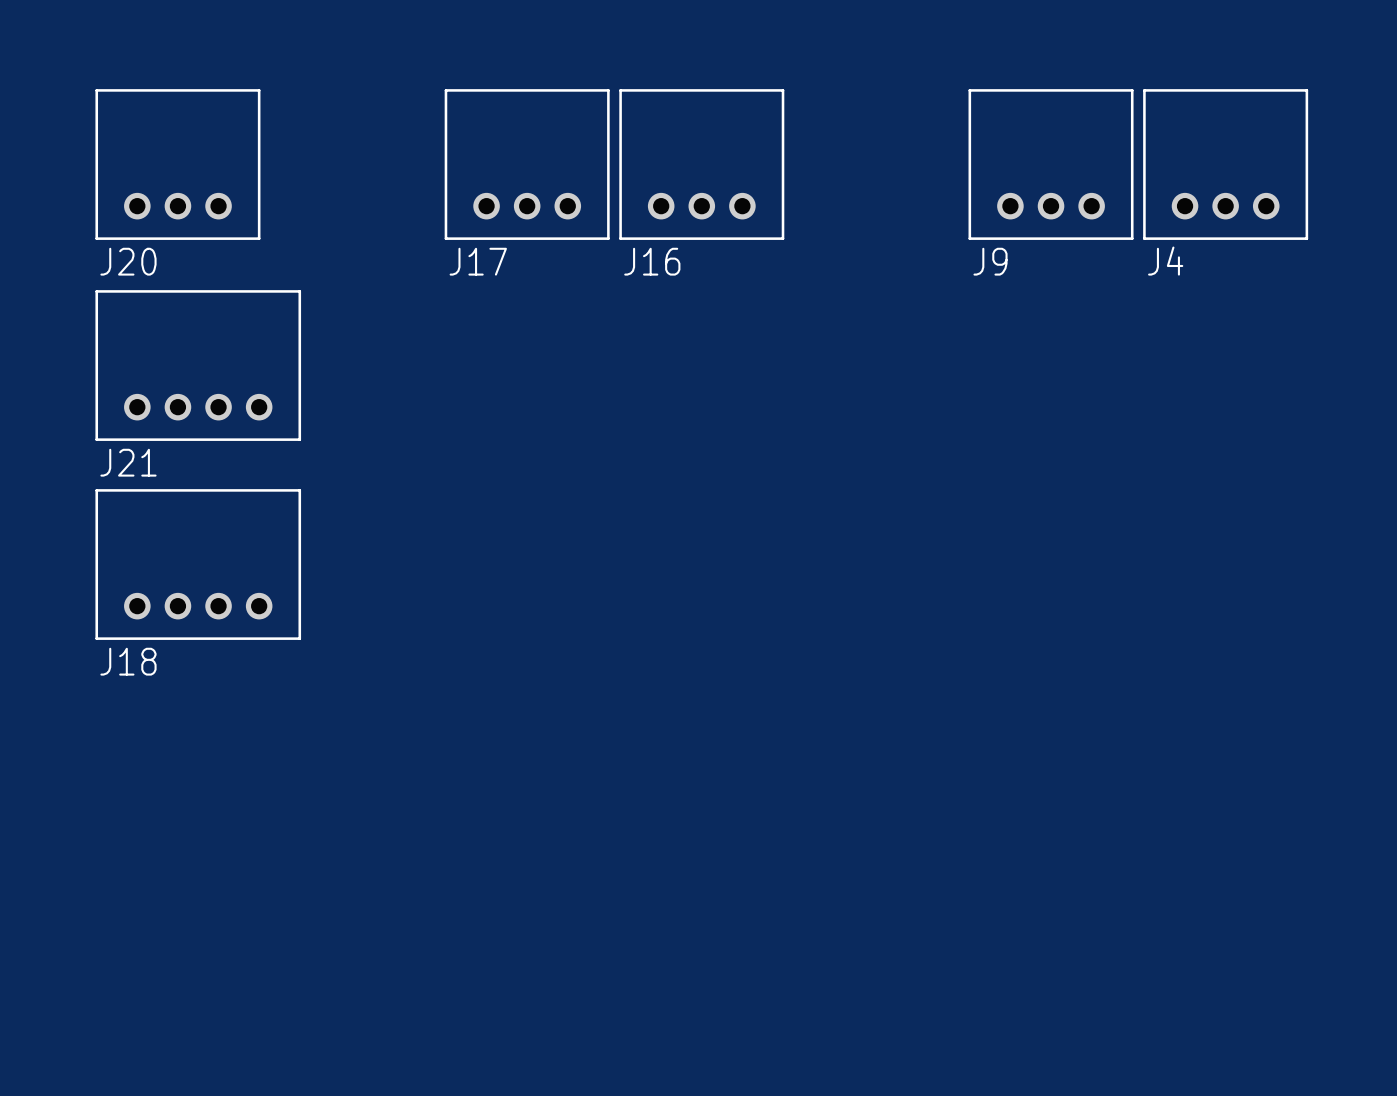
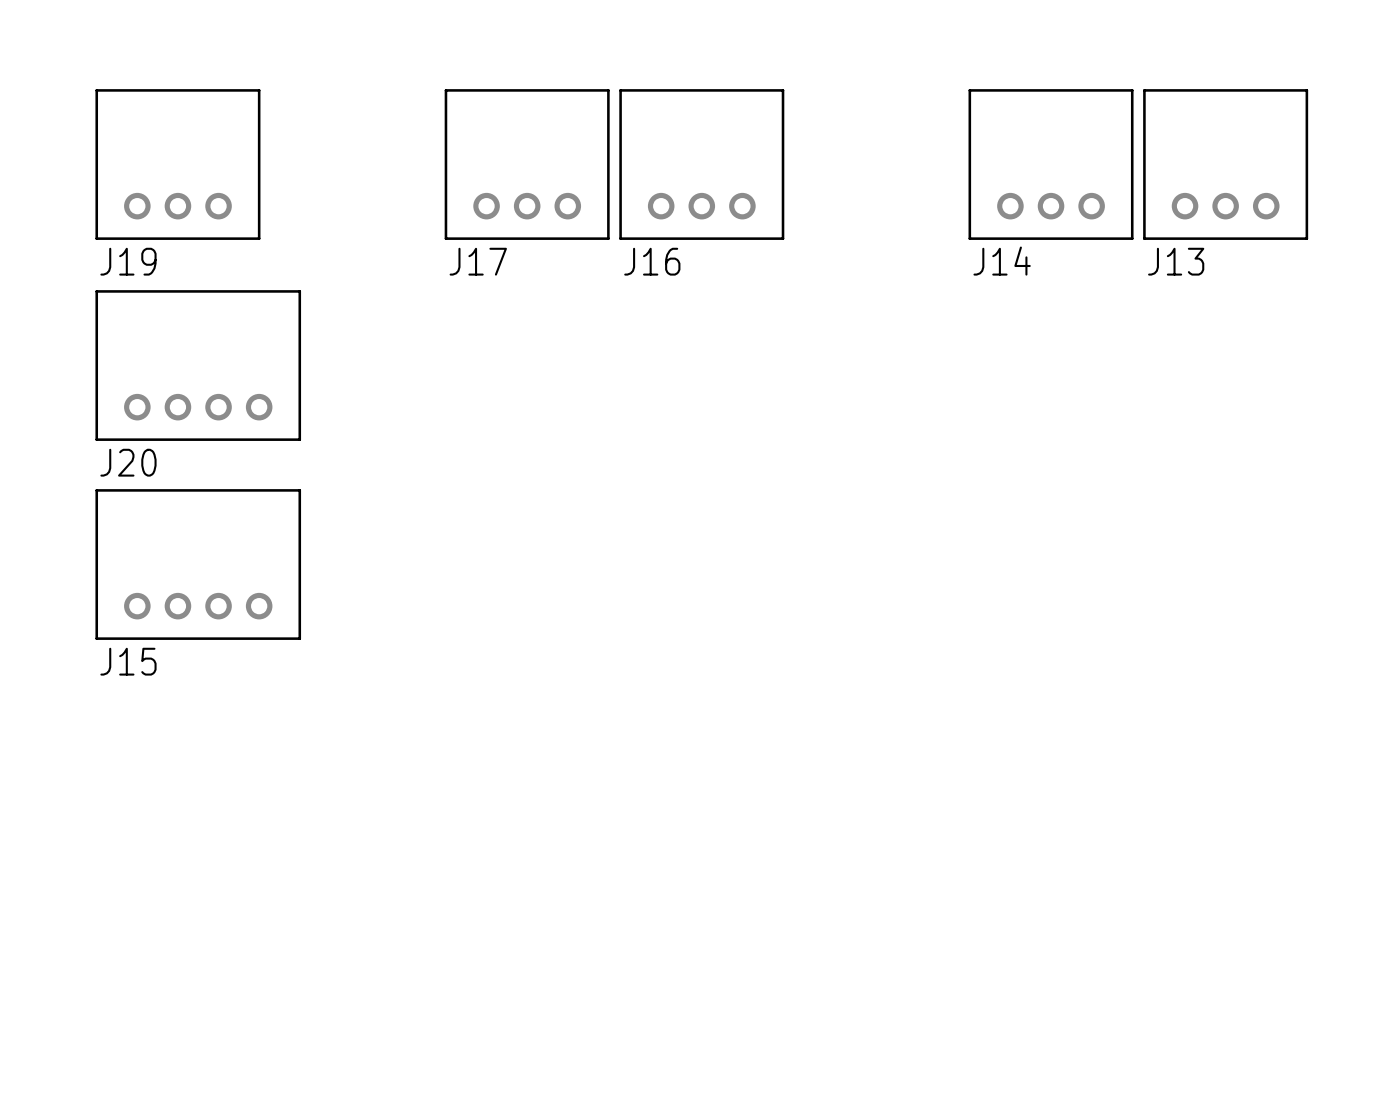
J20 name: J20 (128, 261) -> J19 (128, 261)
J9 name: J9 (990, 261) -> J14 (1002, 261)
J4 name: J4 (1165, 261) -> J13 (1176, 261)
J21 name: J21 (128, 462) -> J20 (128, 462)
J18 name: J18 (128, 661) -> J15 (128, 661)

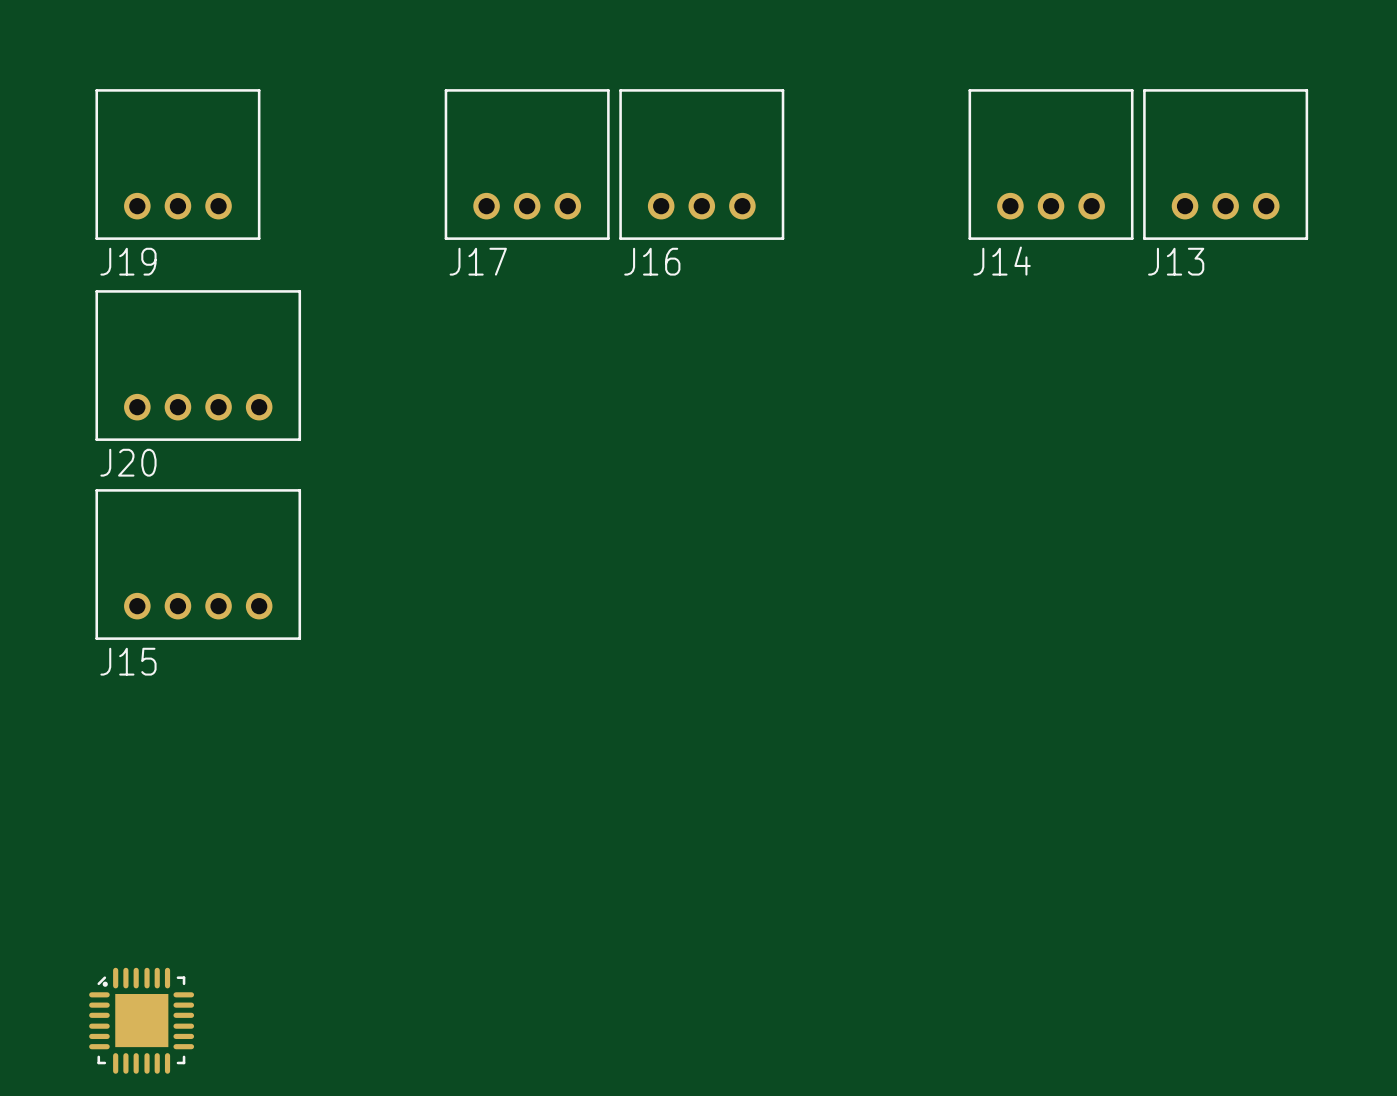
part: none -> (141, 1020)

